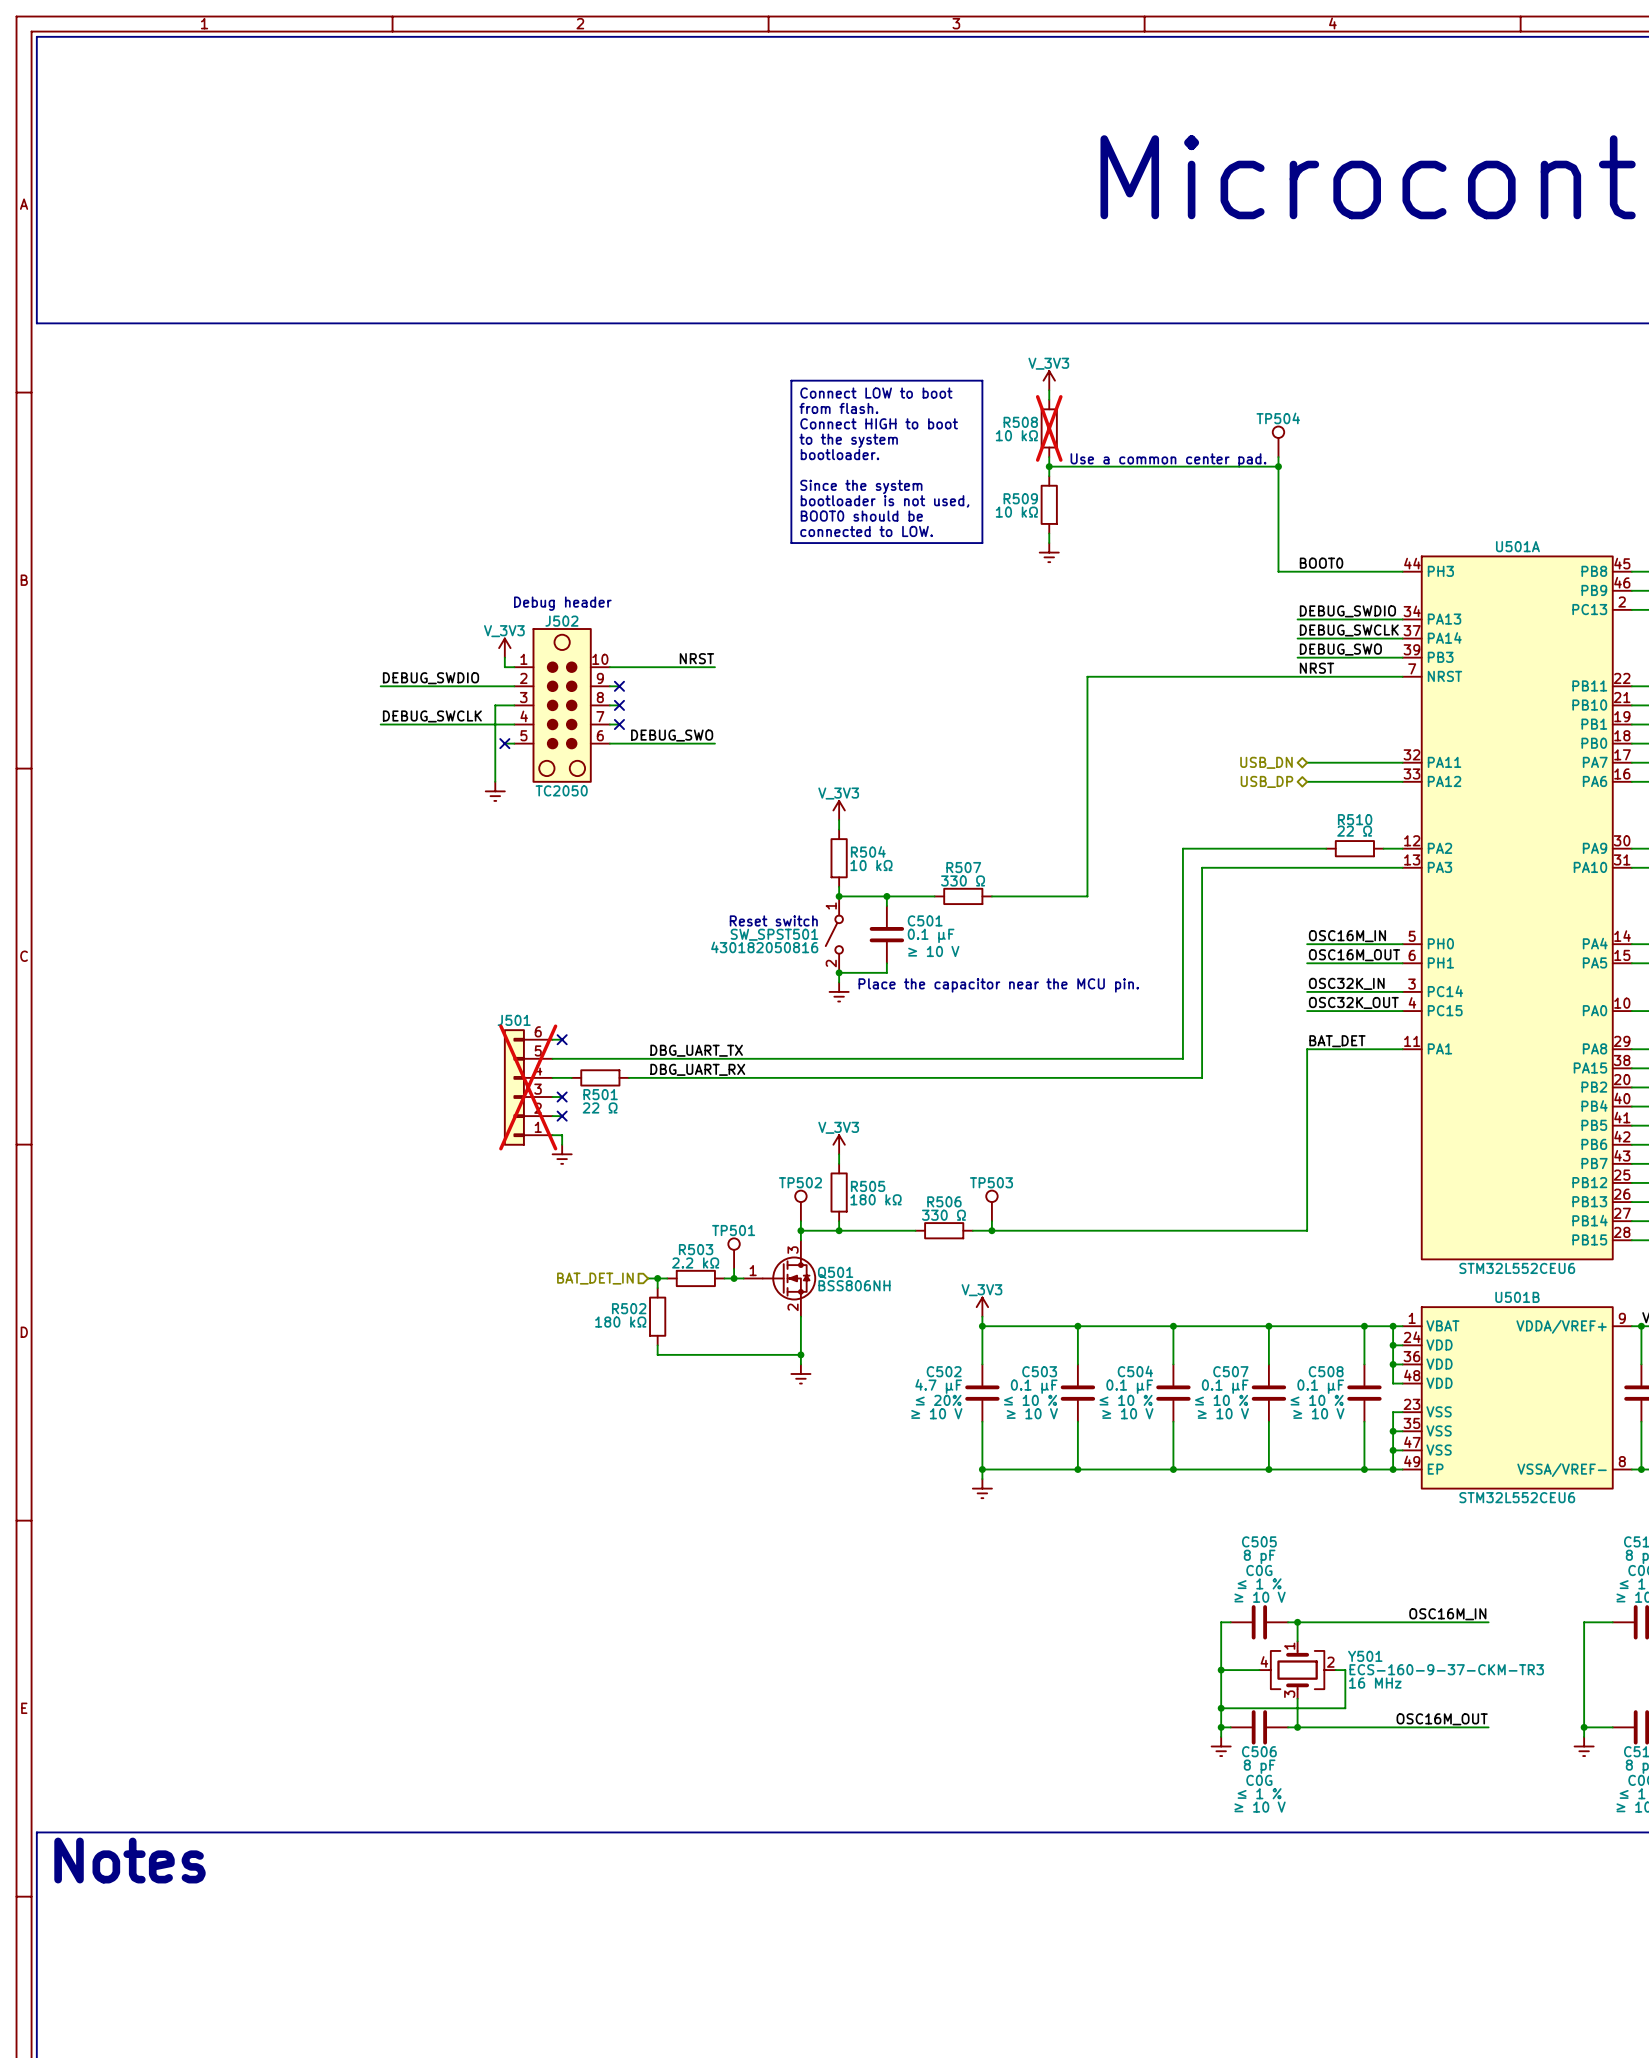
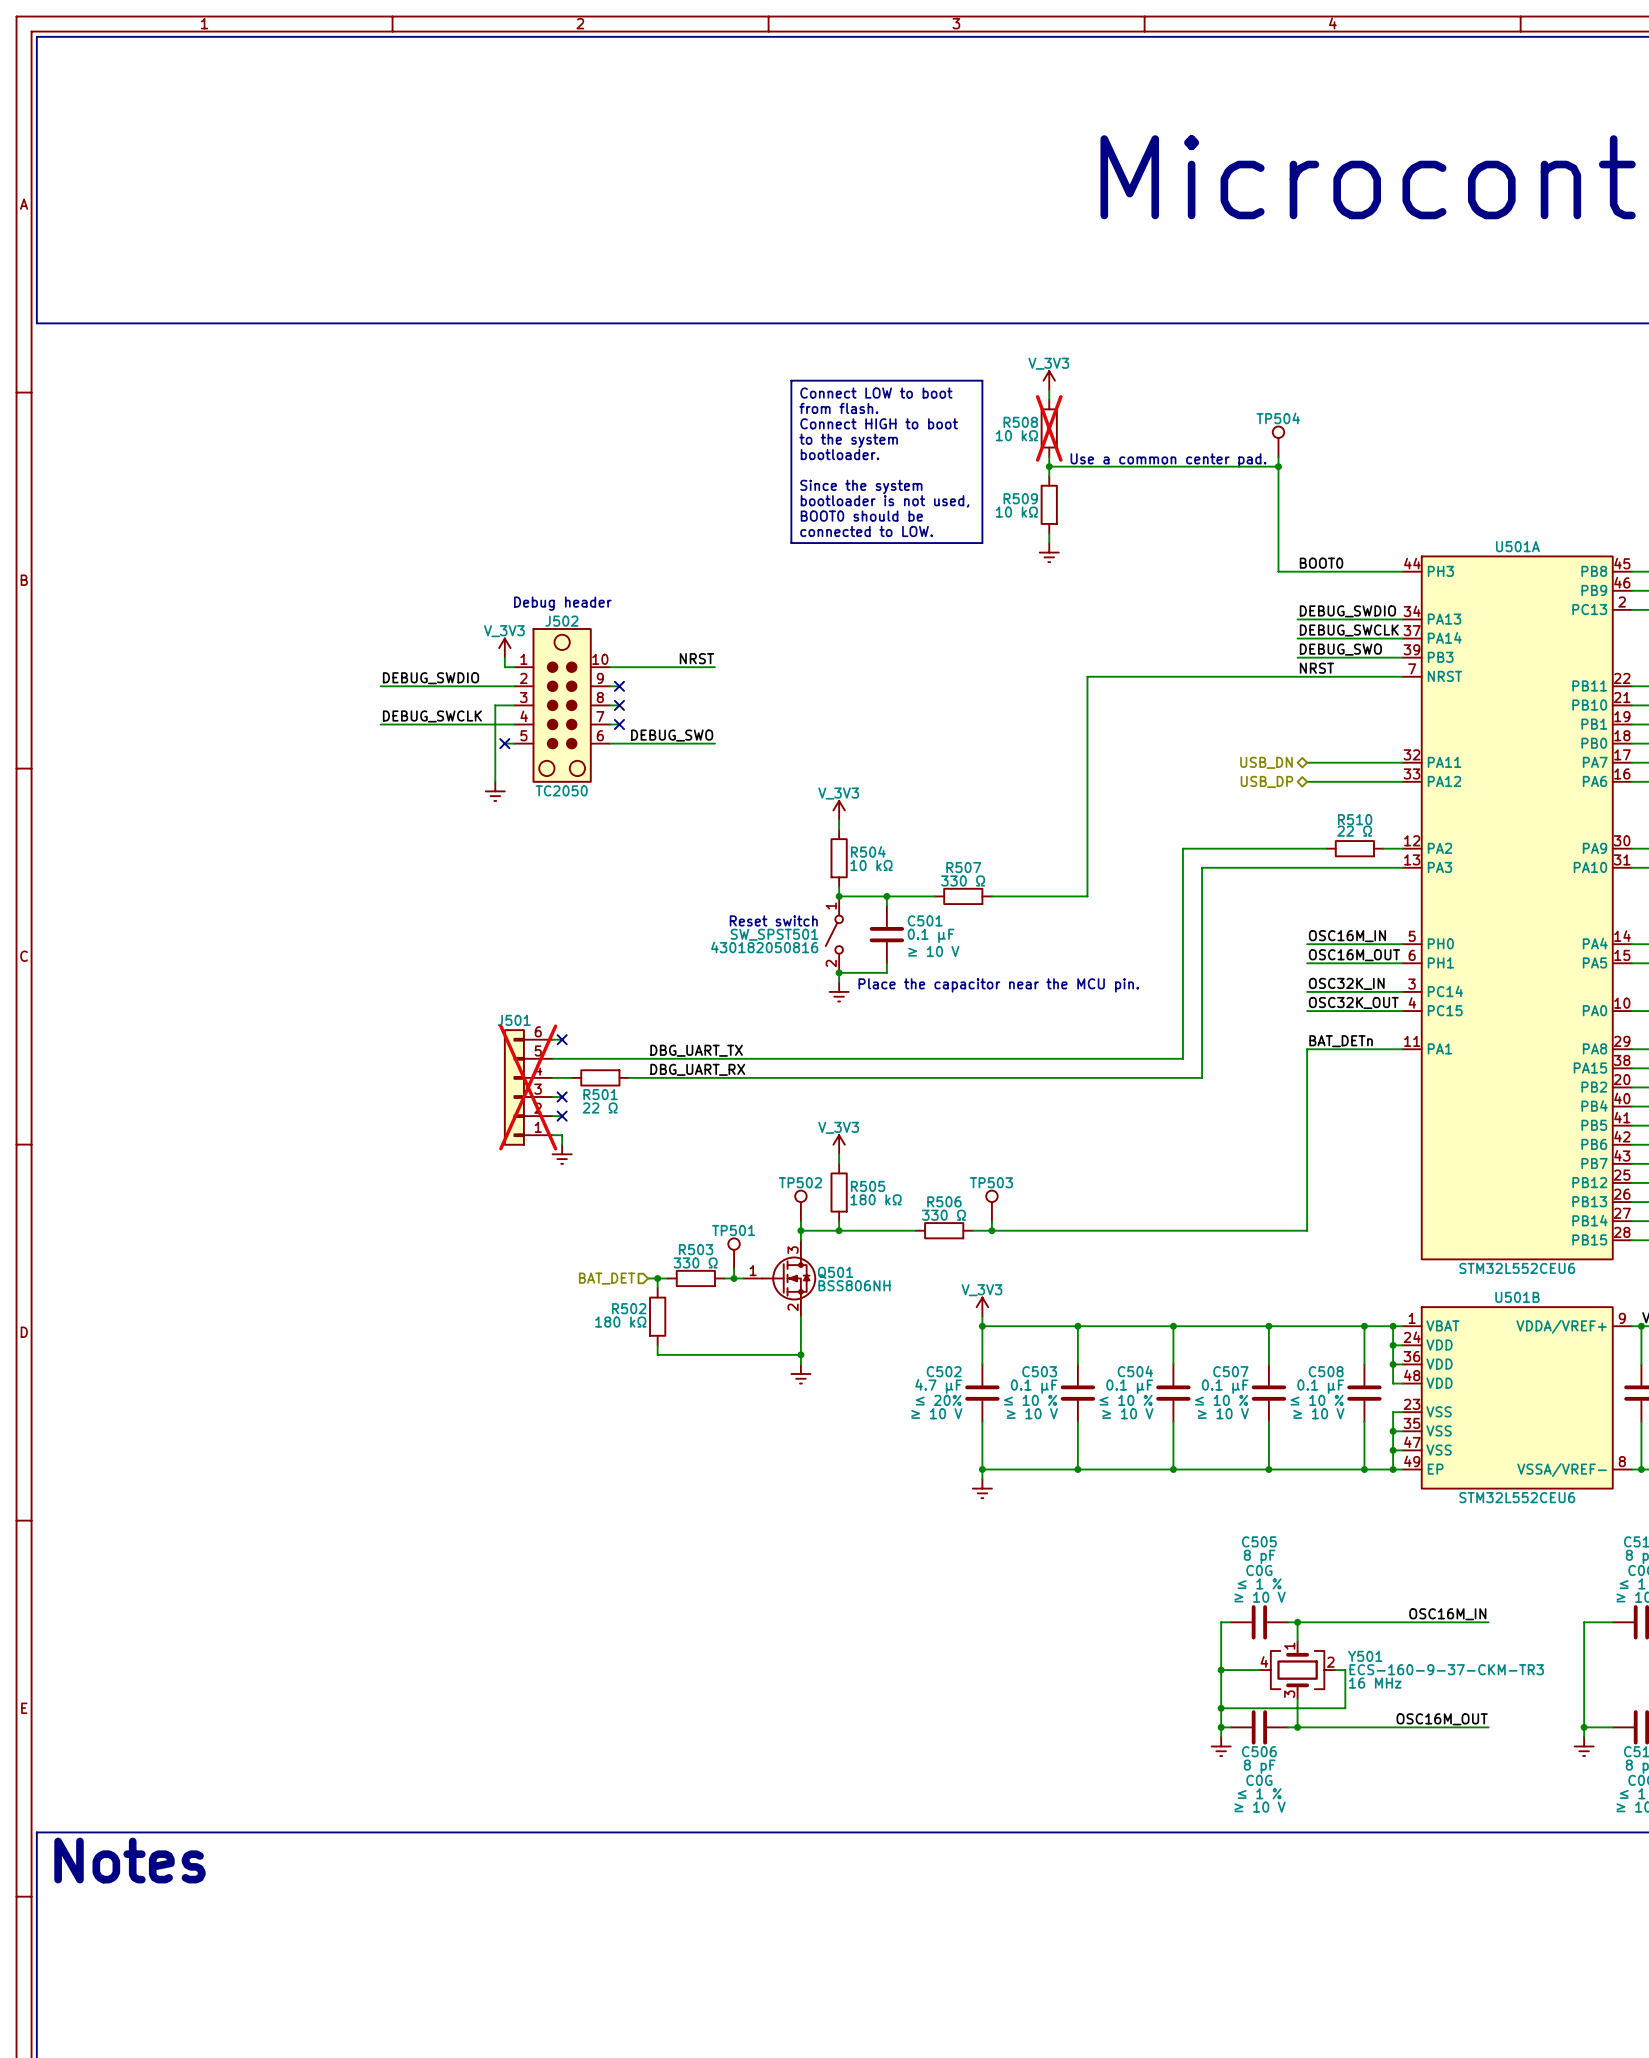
label: BAT_DET (1337, 1041) -> BAT_DETn (1341, 1041)
R503 value: 2.2 kΩ (695, 1262) -> 330 Ω (695, 1262)
hierarchical label: BAT_DET_IN (595, 1278) -> BAT_DET (607, 1278)

